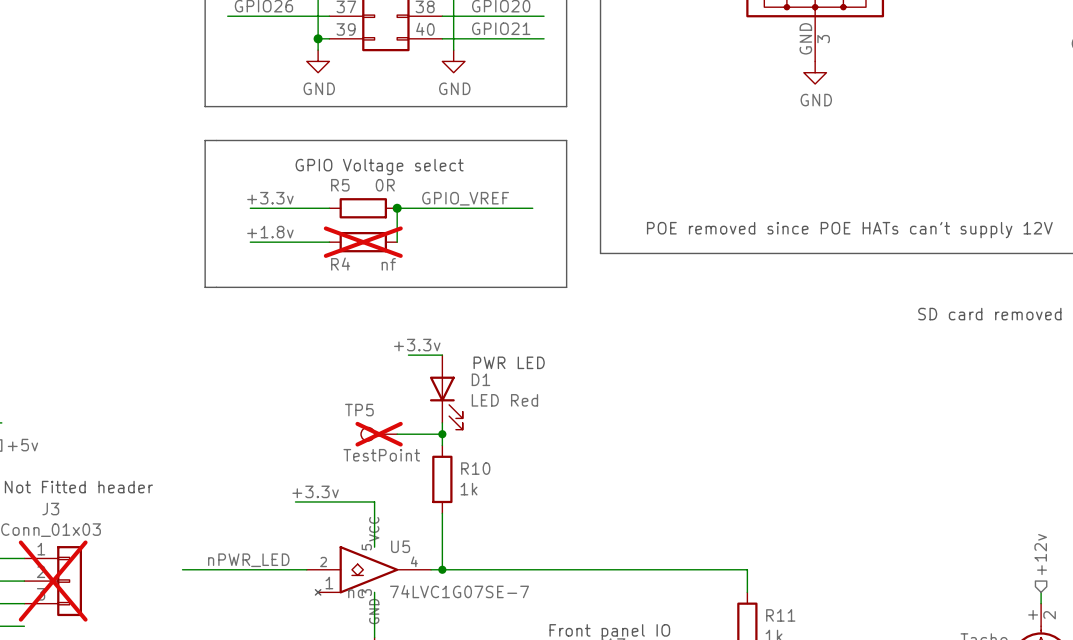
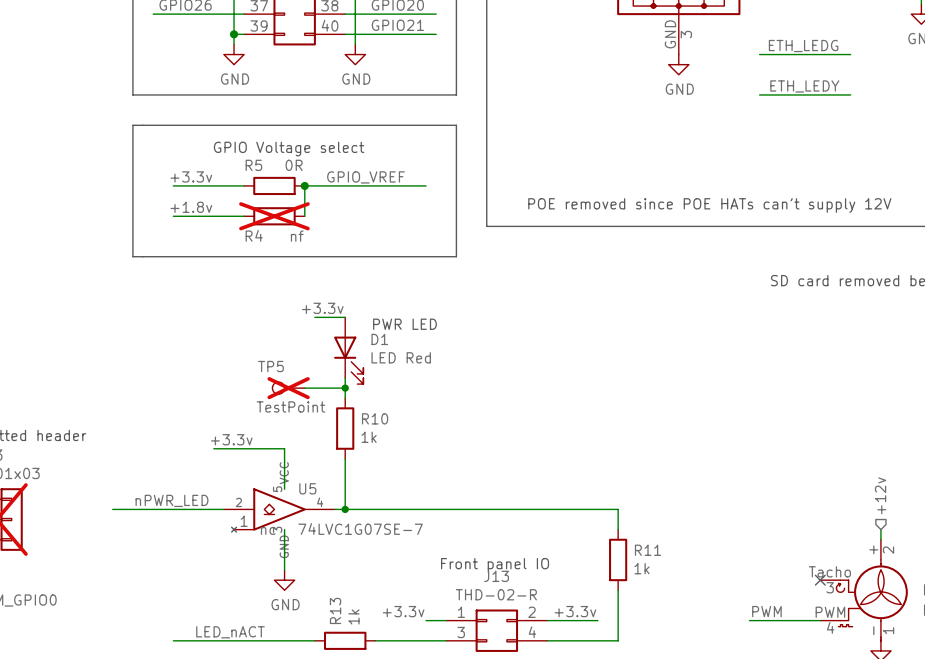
label: none -> ETH_LEDG (803, 46)
wire: none -> (759, 54) (850, 54)
label: none -> ETH_LEDY (804, 86)
wire: none -> (759, 94) (850, 94)

